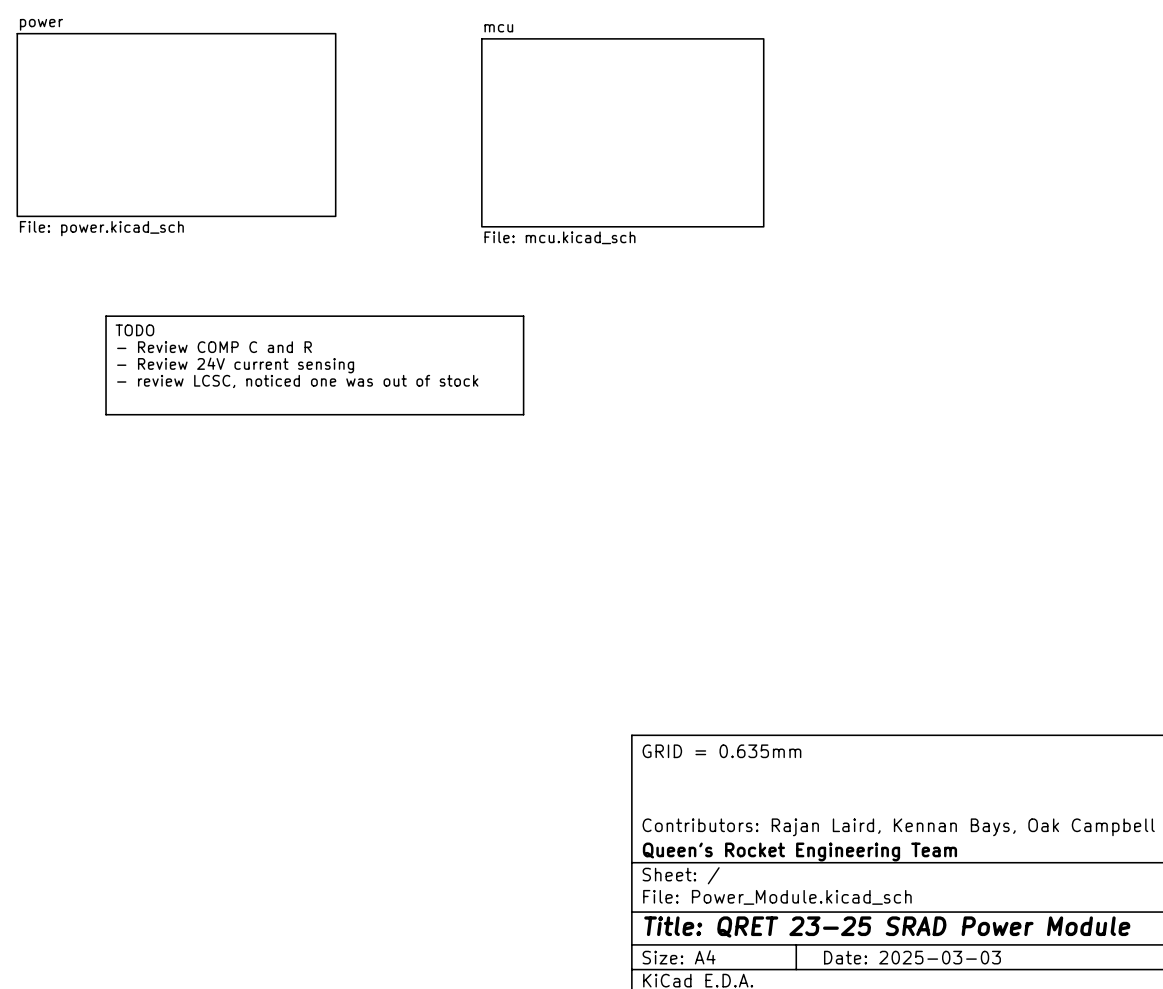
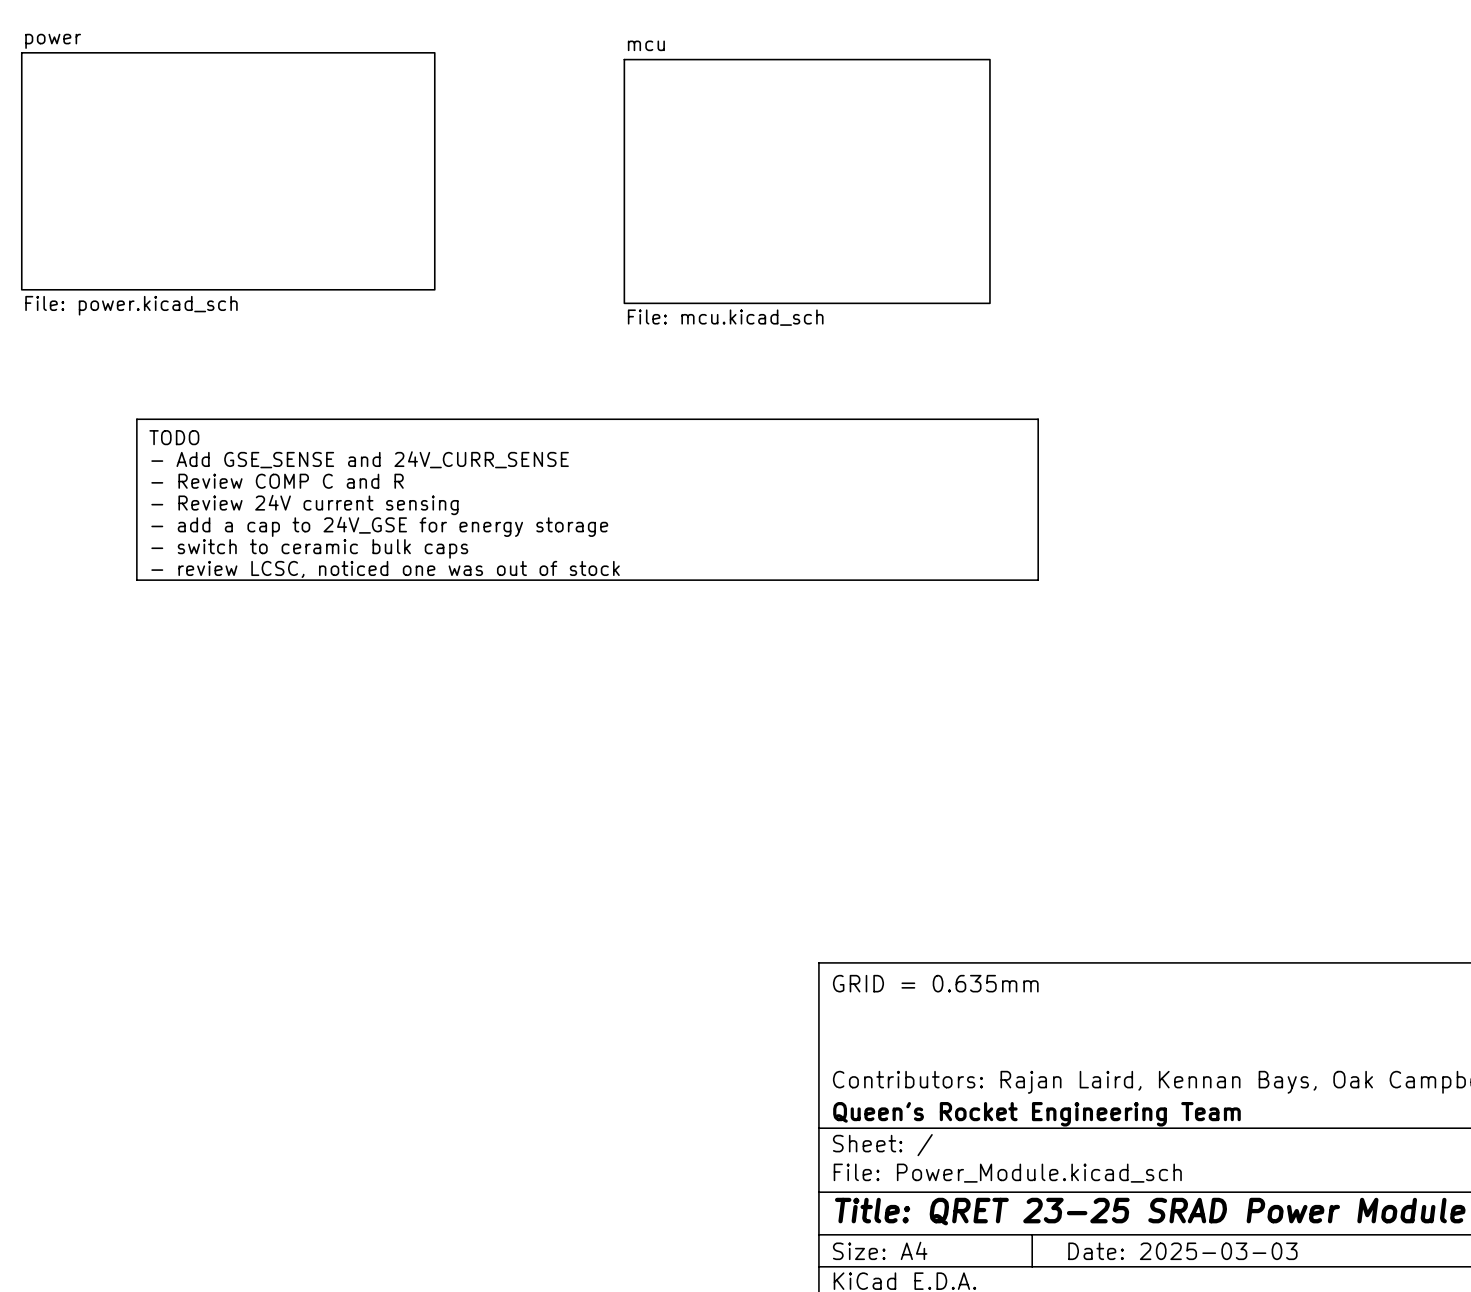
line: (523, 316) (523, 414) (106, 414) -> (678, 419) (1038, 419) (1038, 580) (136, 580) (136, 547)
text: - Review COMP C and R (214, 347) -> - Add GSE_SENSE and 24V_CURR_SENSE (360, 459)
text: - Review 24V current sensing (235, 365) -> - Review COMP C and R (277, 481)
text: - review LCSC, noticed one was out of stock (297, 381) -> - Review 24V current sensing (304, 504)
text: none -> - add a cap to 24V_GSE for energy storage (379, 526)
text: none -> - switch to ceramic bulk caps (309, 548)
text: none -> - review LCSC, noticed one was out of stock (385, 569)

